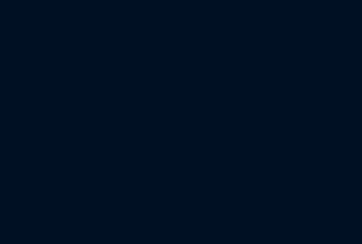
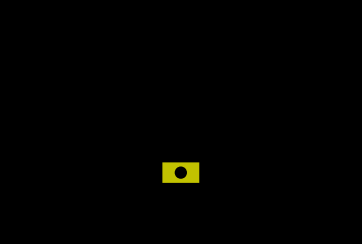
part: none -> (180, 172)

